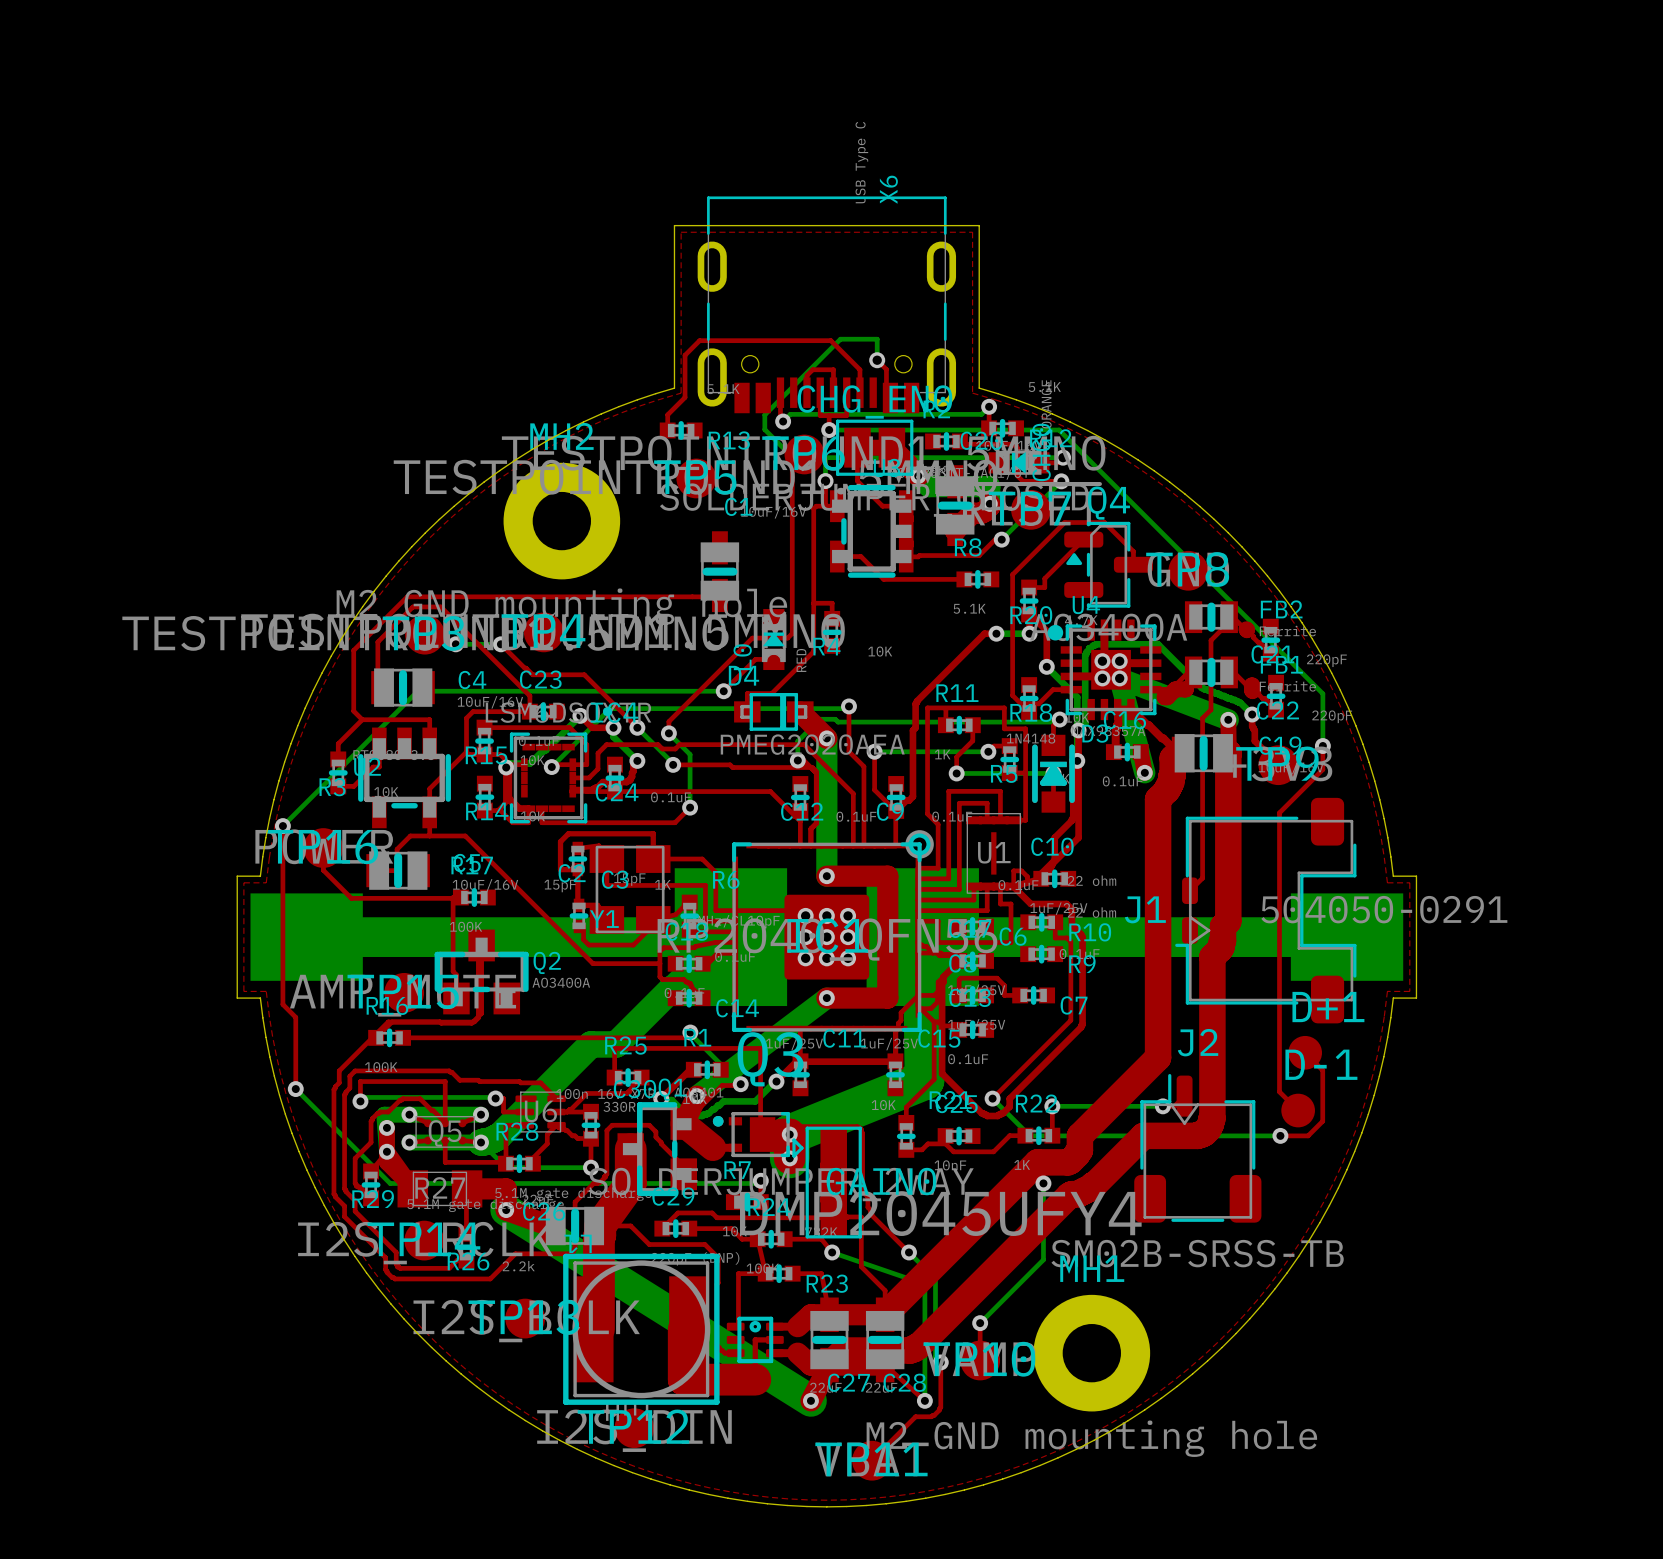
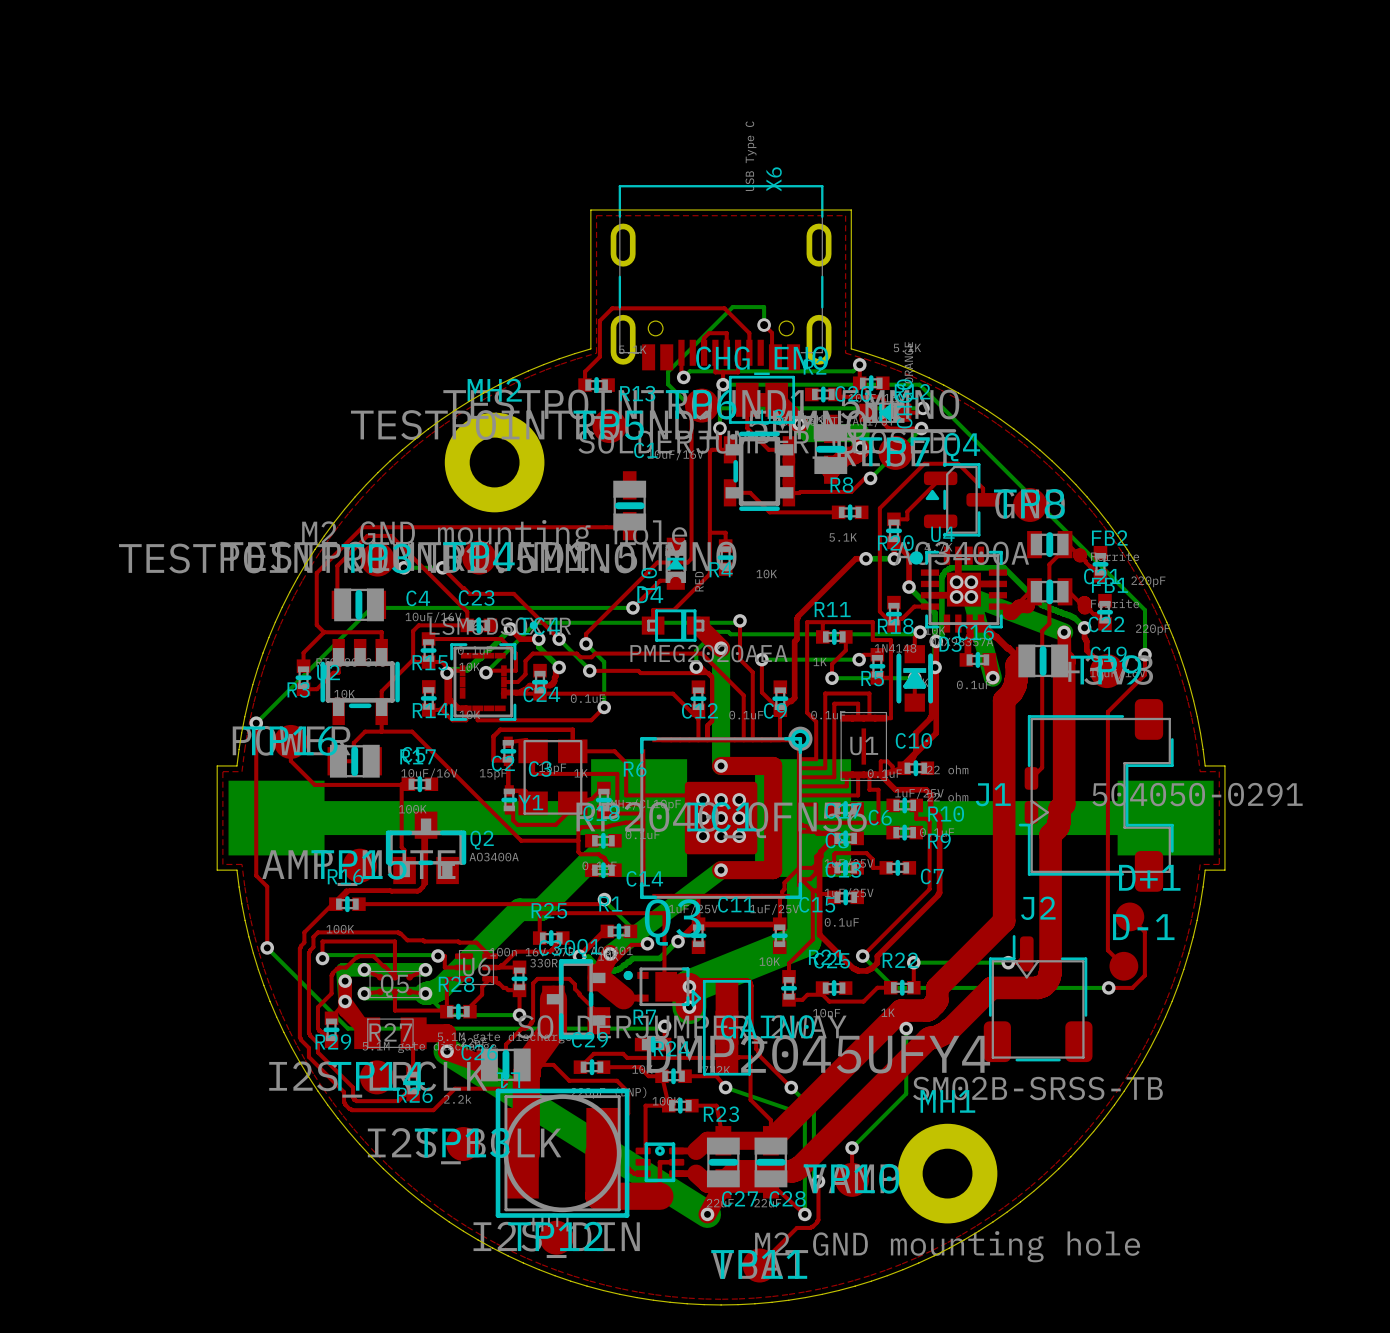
top track: (735, 953) (718, 953) (707, 963) (702, 963) -> none

